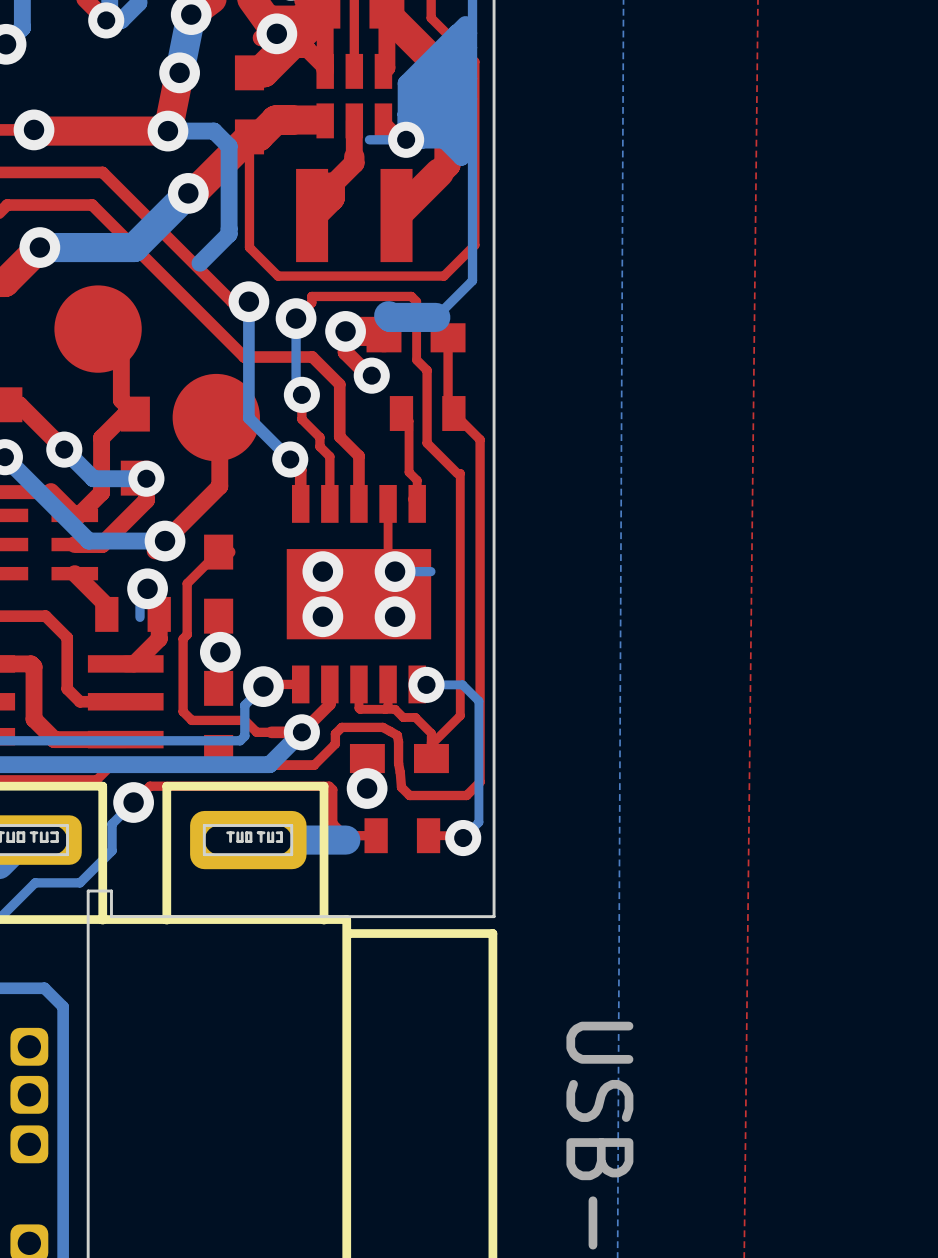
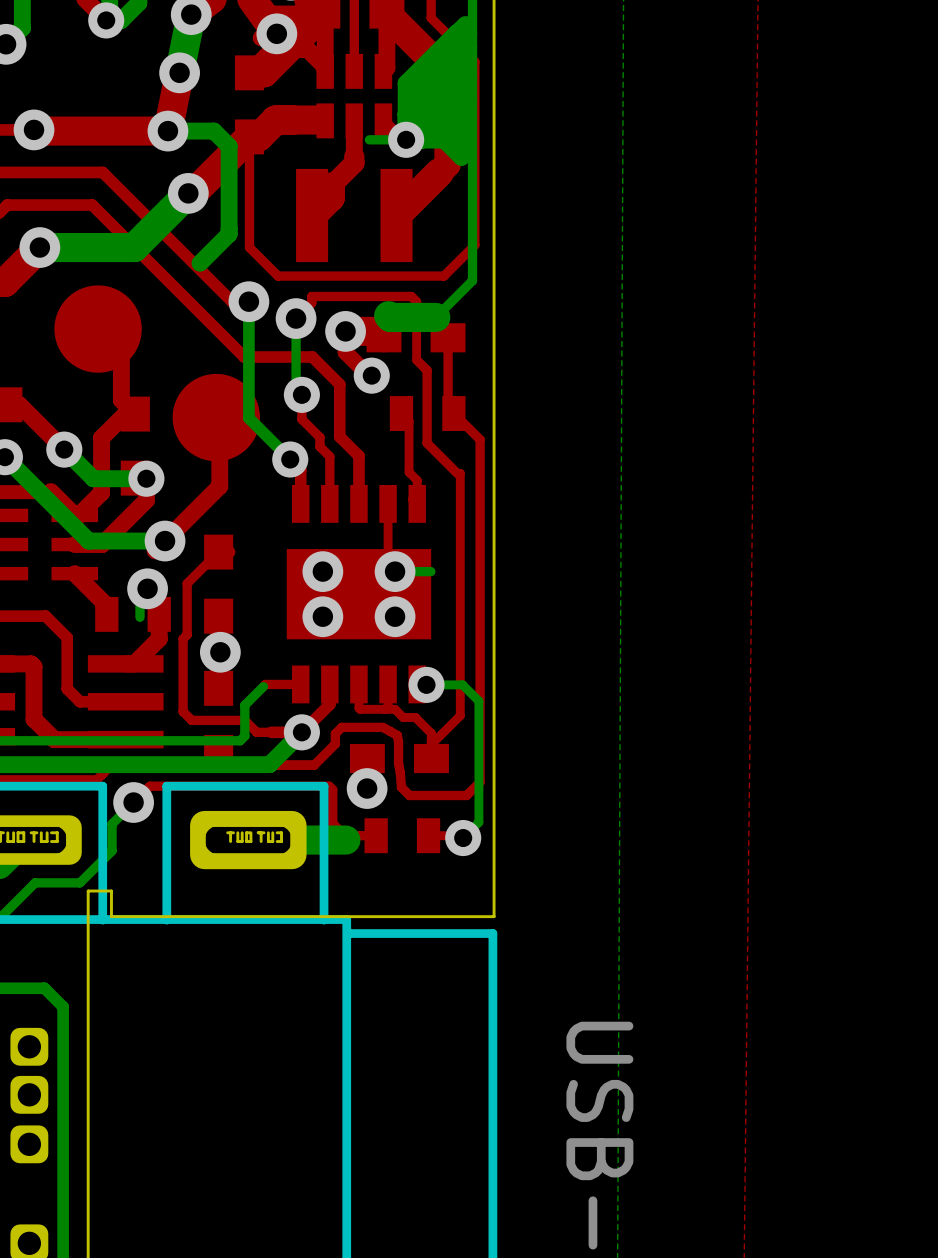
via: (263, 686) -> none

